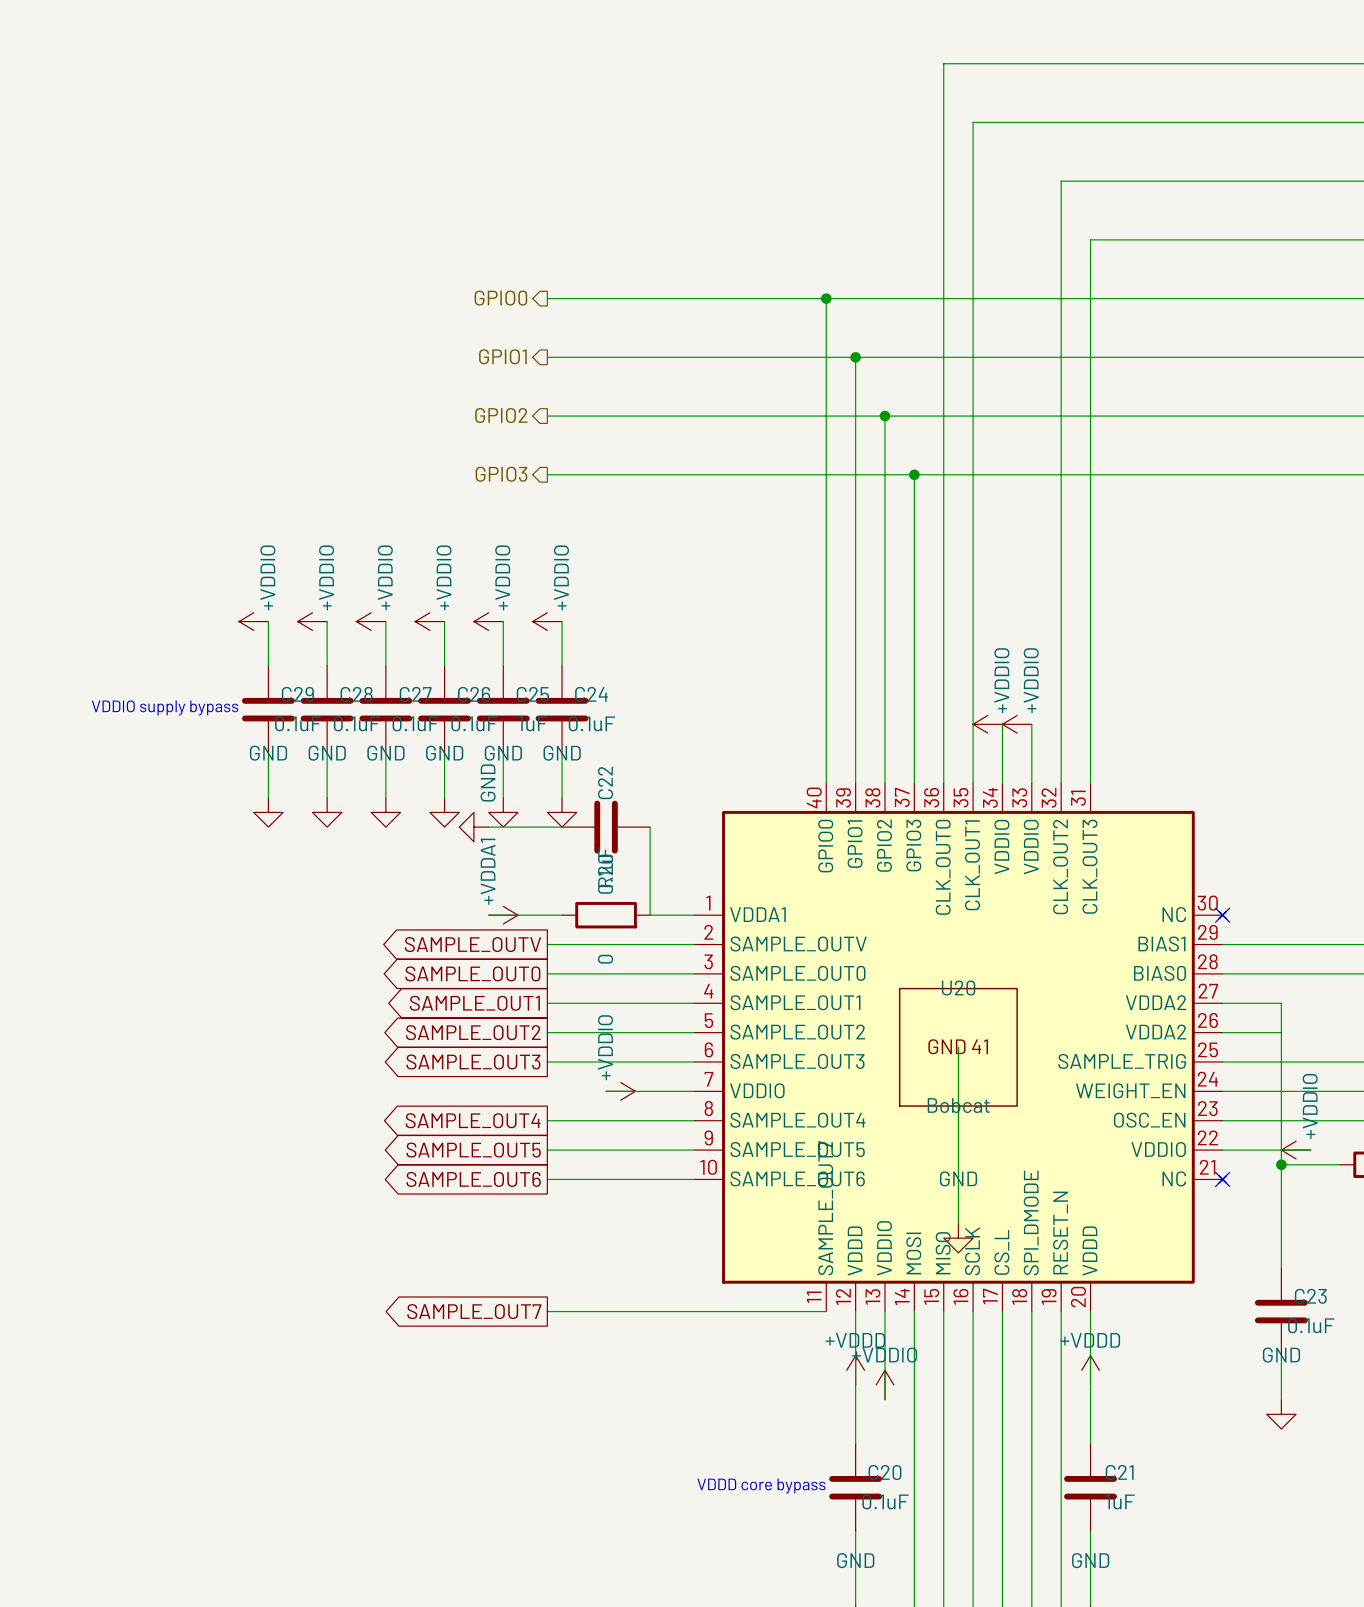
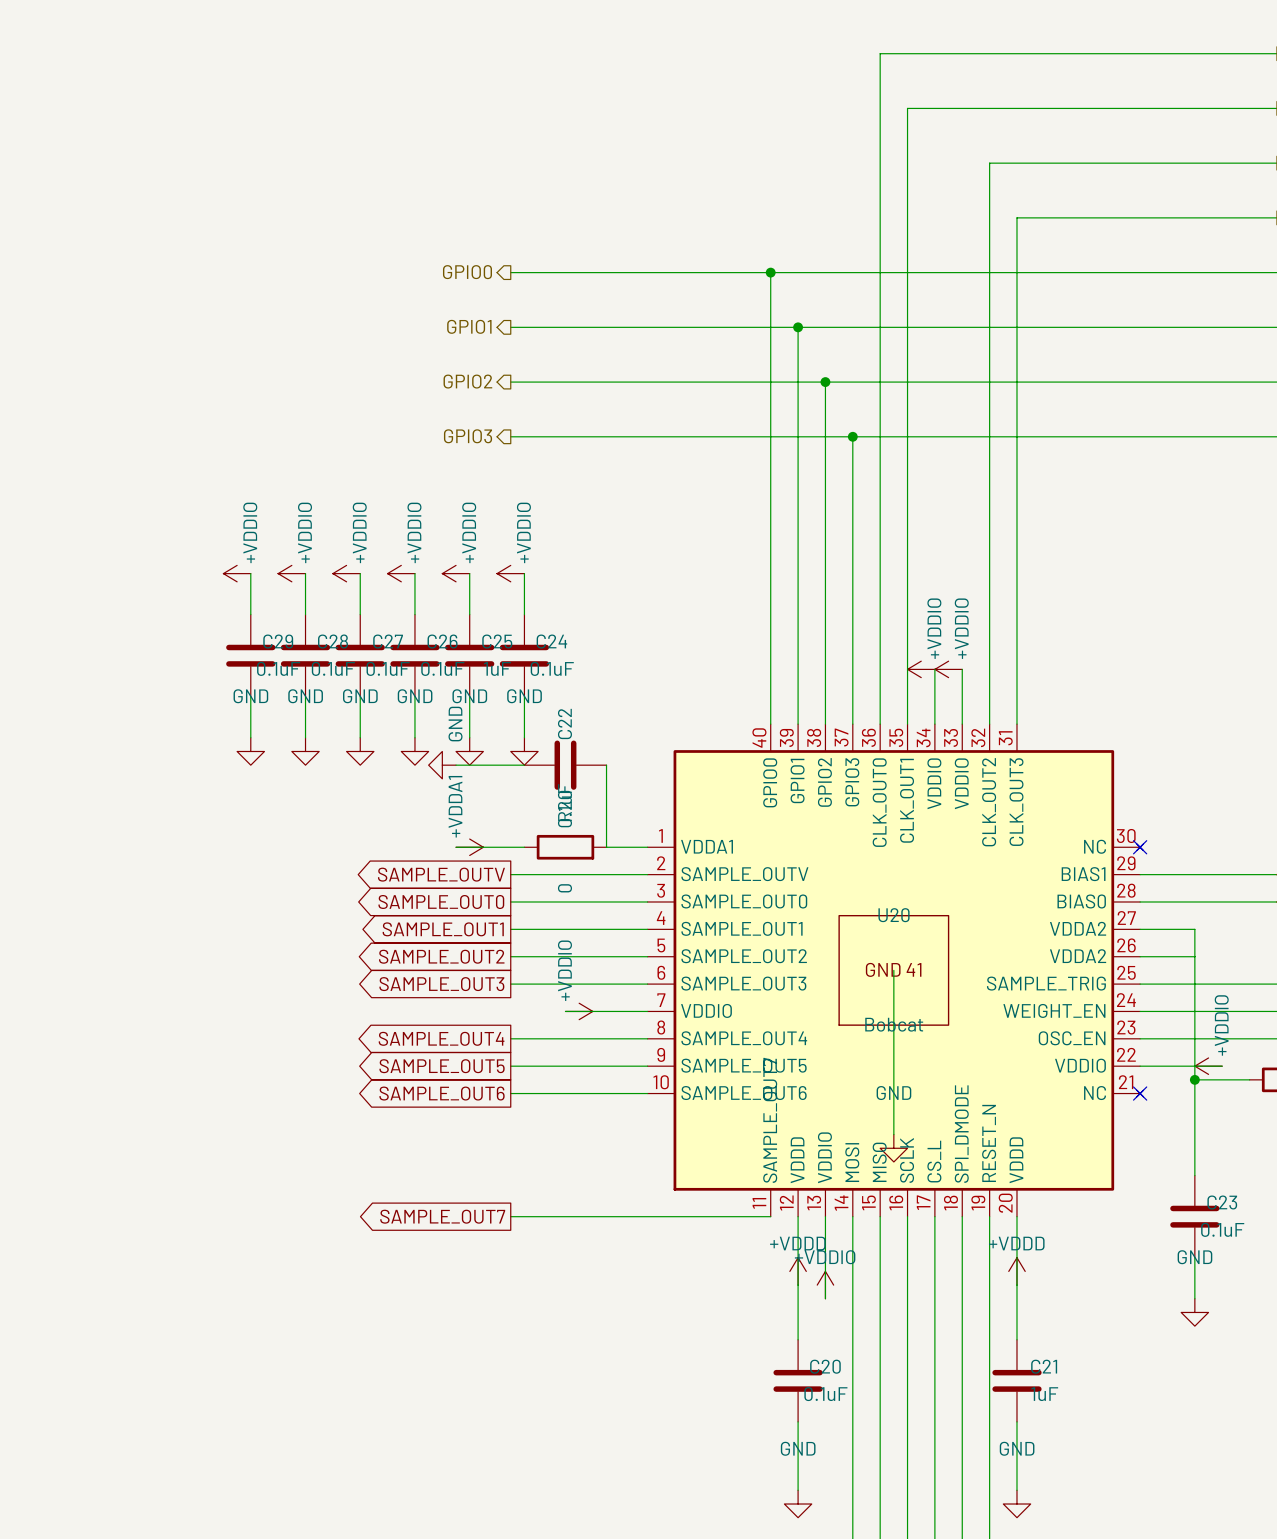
text: VDDIO supply bypass (165, 707) -> none
text: VDDD core bypass (761, 1486) -> none

